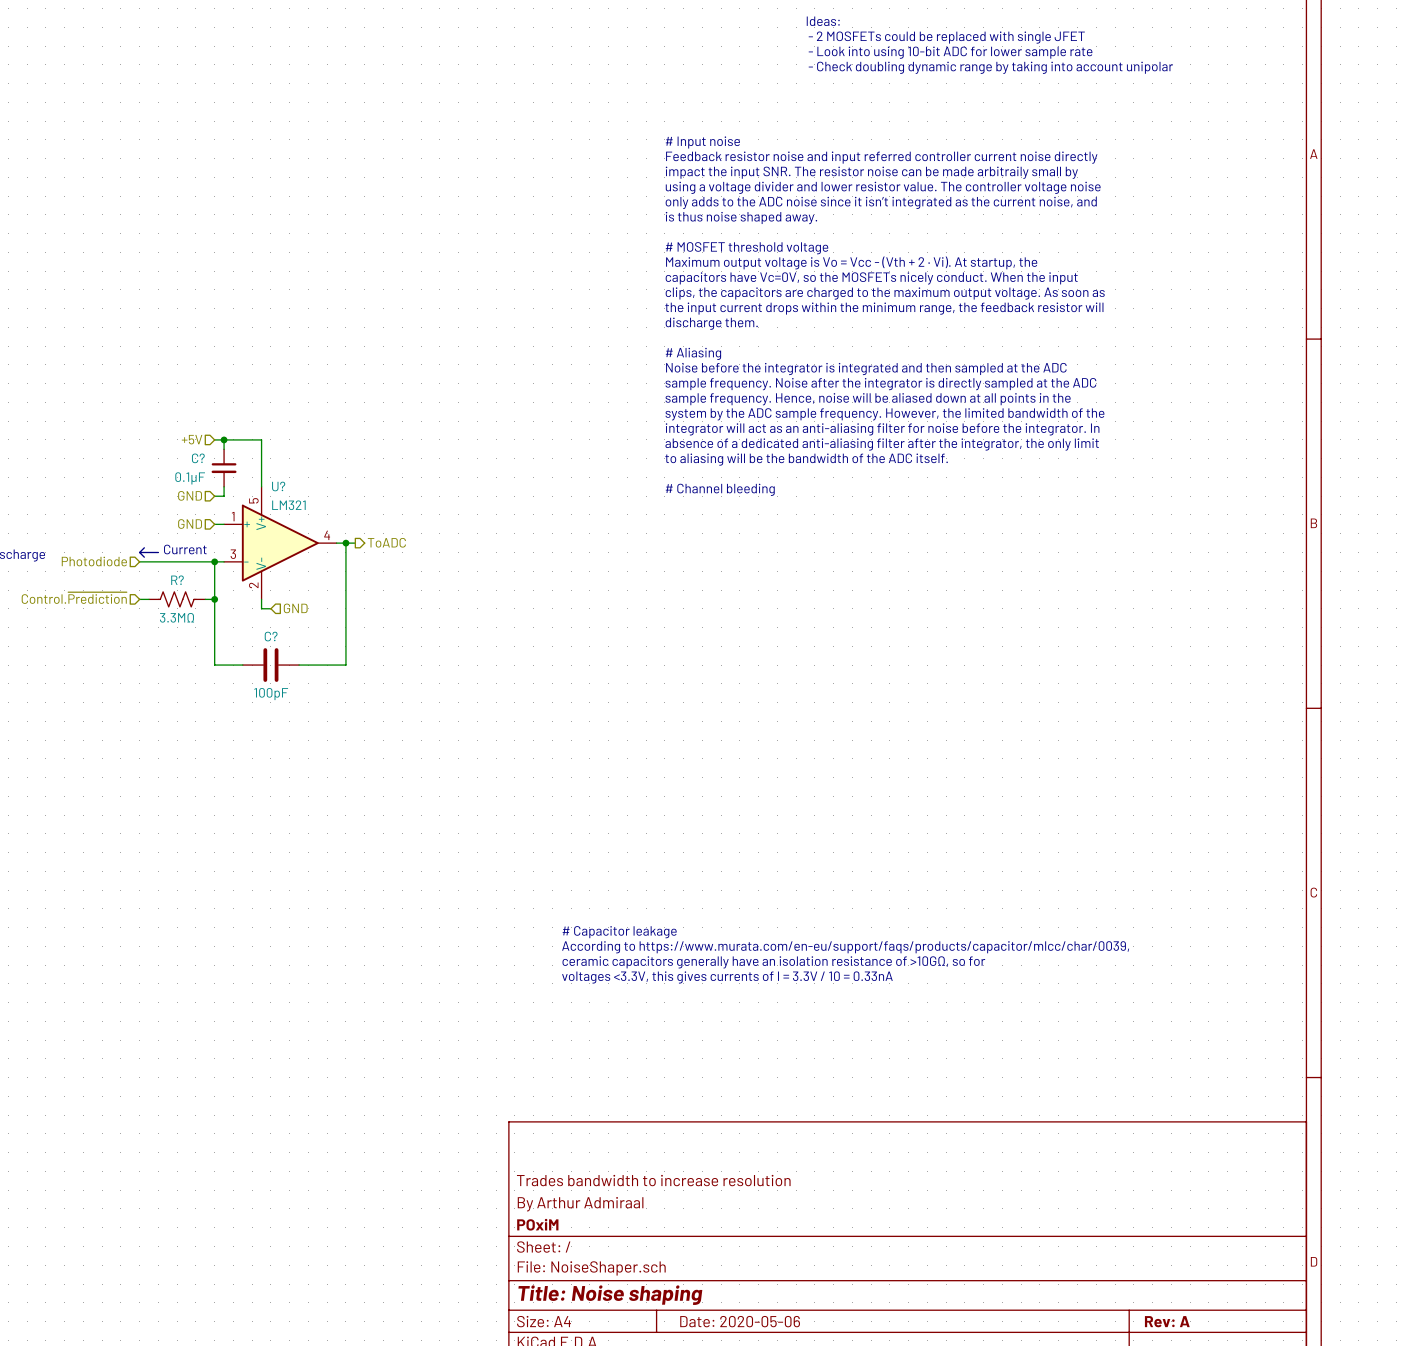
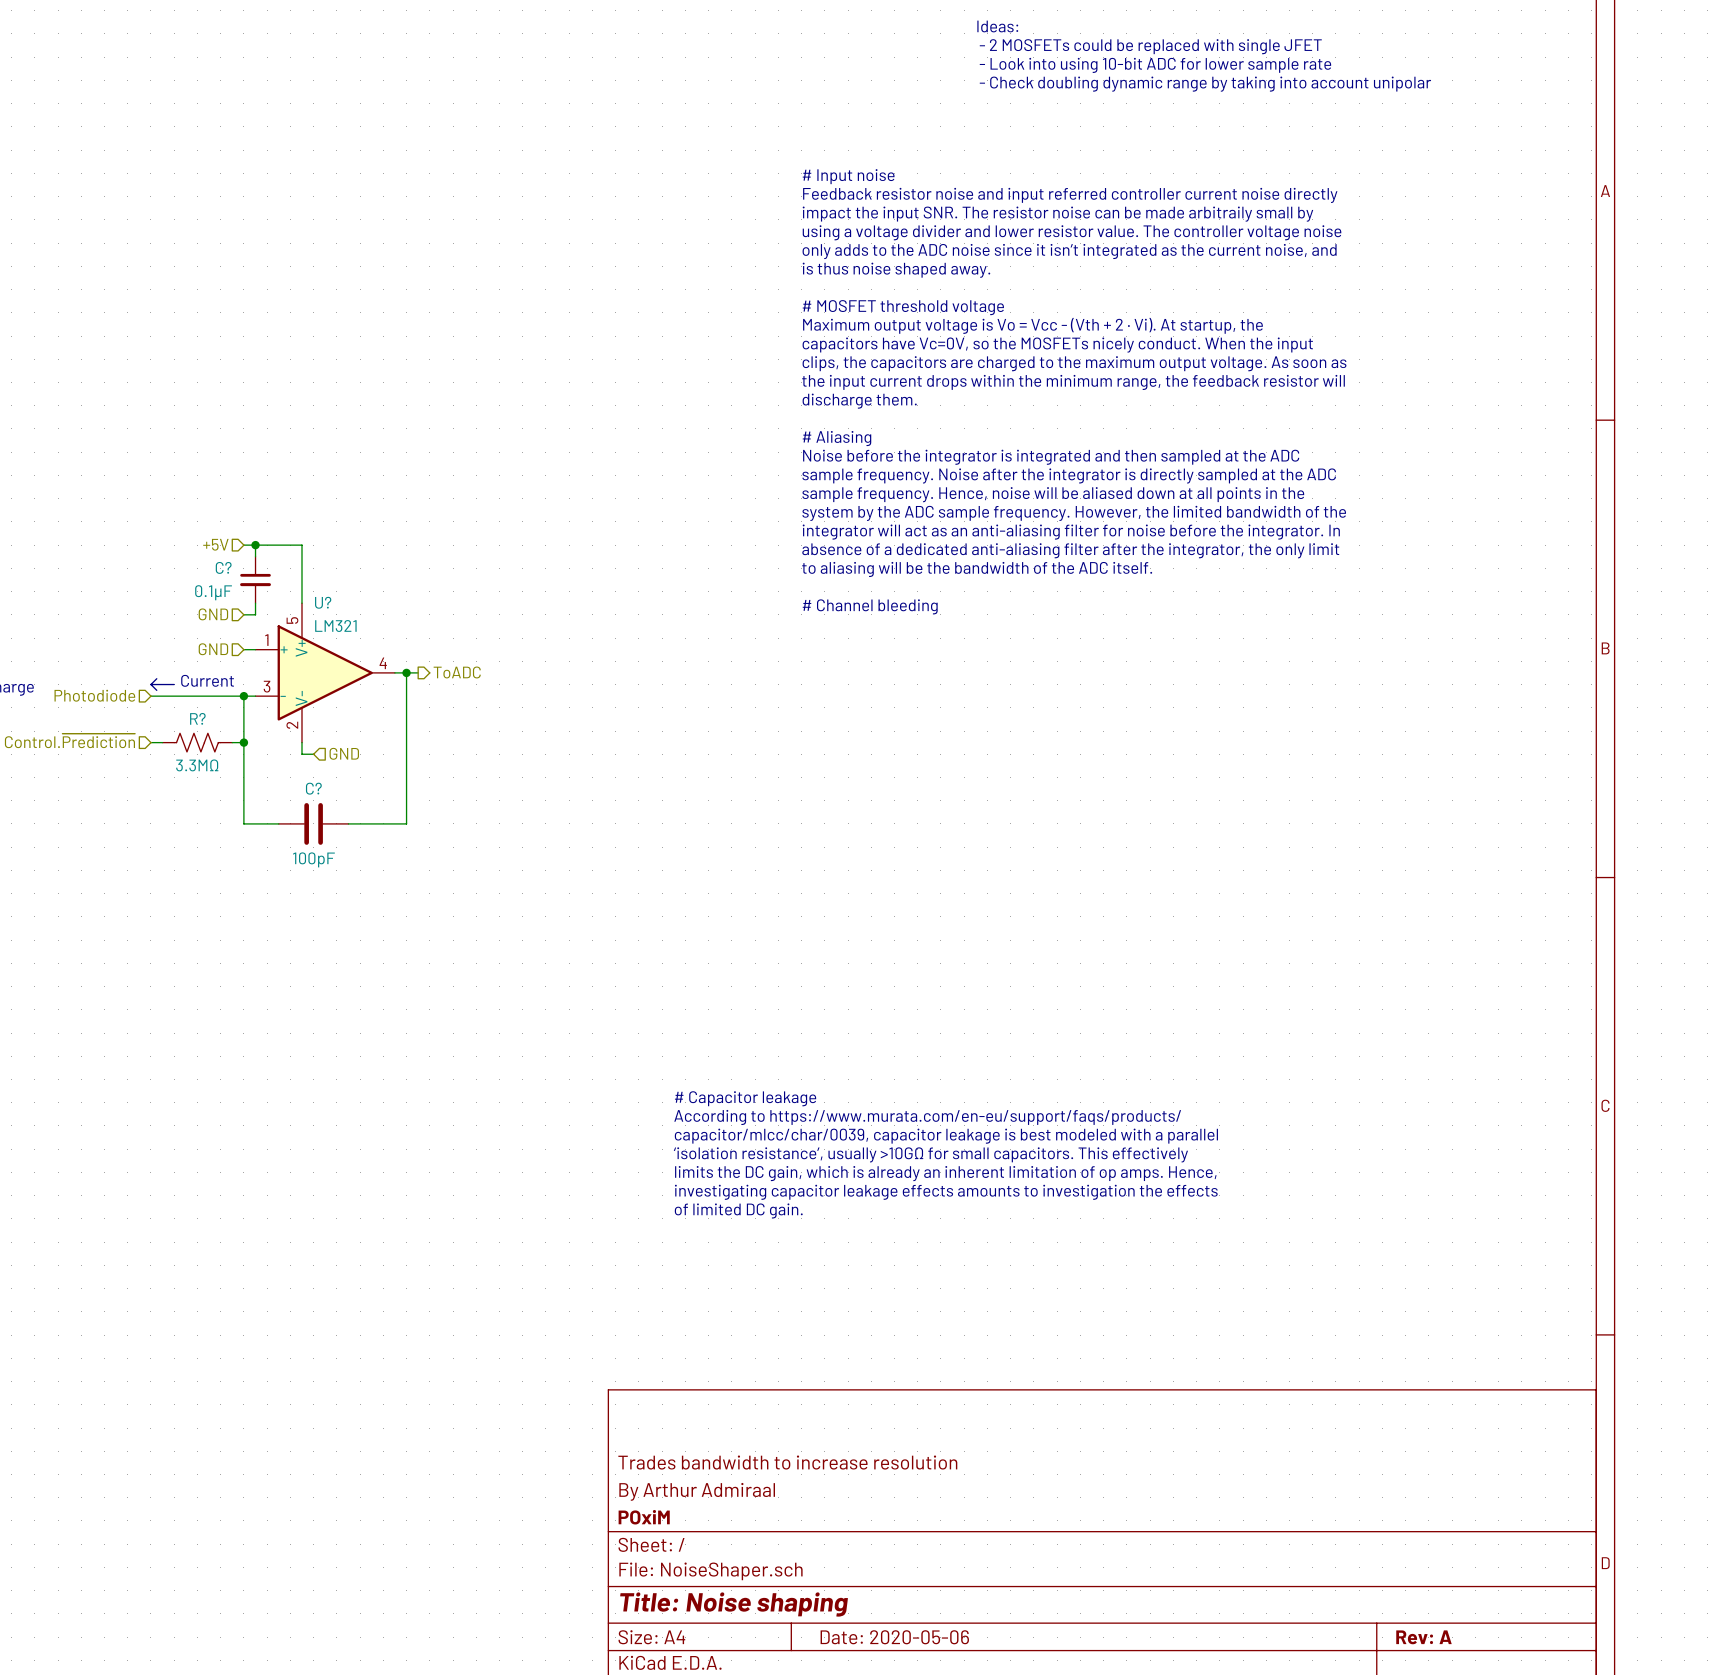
text: none -> # Capacitor leakage (745, 1098)
text: none -> According to https://www.murata.com/en-eu/support/faqs/products/ (927, 1117)
text: none -> capacitor/mlcc/char/0039, capacitor leakage is best modeled with a parallel (946, 1136)
text: # Capacitor leakage (619, 932) -> ‘isolation resistance’, usually >10GΩ for small capacitors. This effectively (930, 1154)
text: According to https://www.murata.com/en-eu/support/faqs/products/capacitor/mlcc/char/0039, (845, 947) -> limits the DC gain, which is already an inherent limitation of op amps. Hence, (945, 1173)
text: ceramic capacitors generally have an isolation resistance of >10GΩ, so for (773, 962) -> investigating capacitor leakage effects amounts to investigation the effects (946, 1192)
text: voltages <3.3V, this gives currents of I = 3.3V / 10 = 0.33nA (727, 977) -> of limited DC gain. (738, 1210)

